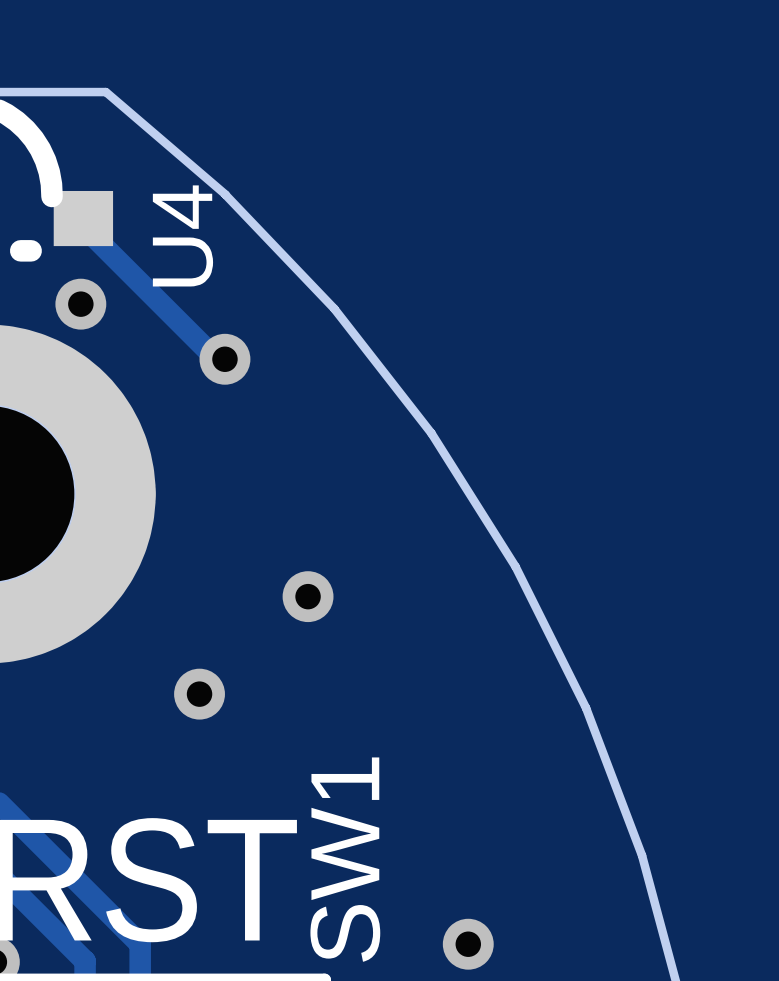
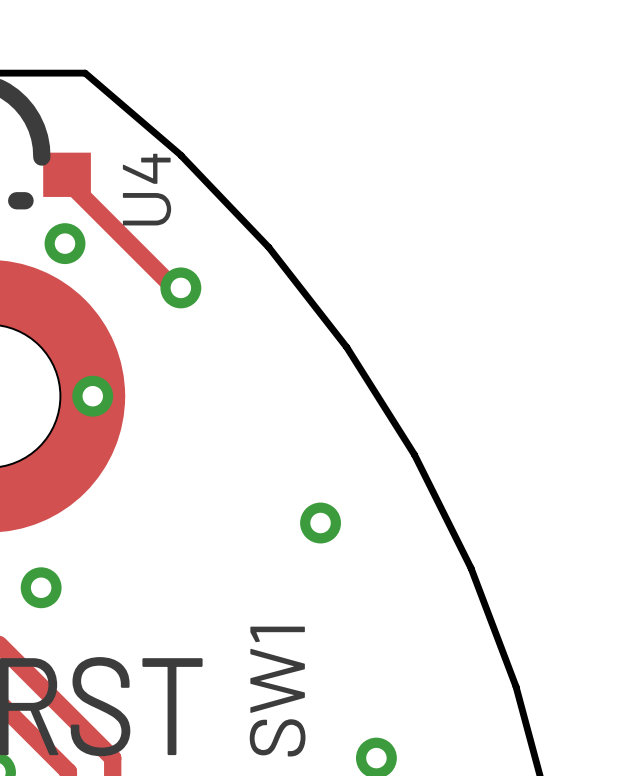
via: none -> (92, 396)
via: (308, 596) -> none
via: none -> (320, 523)
via: (199, 694) -> none
via: none -> (41, 587)

